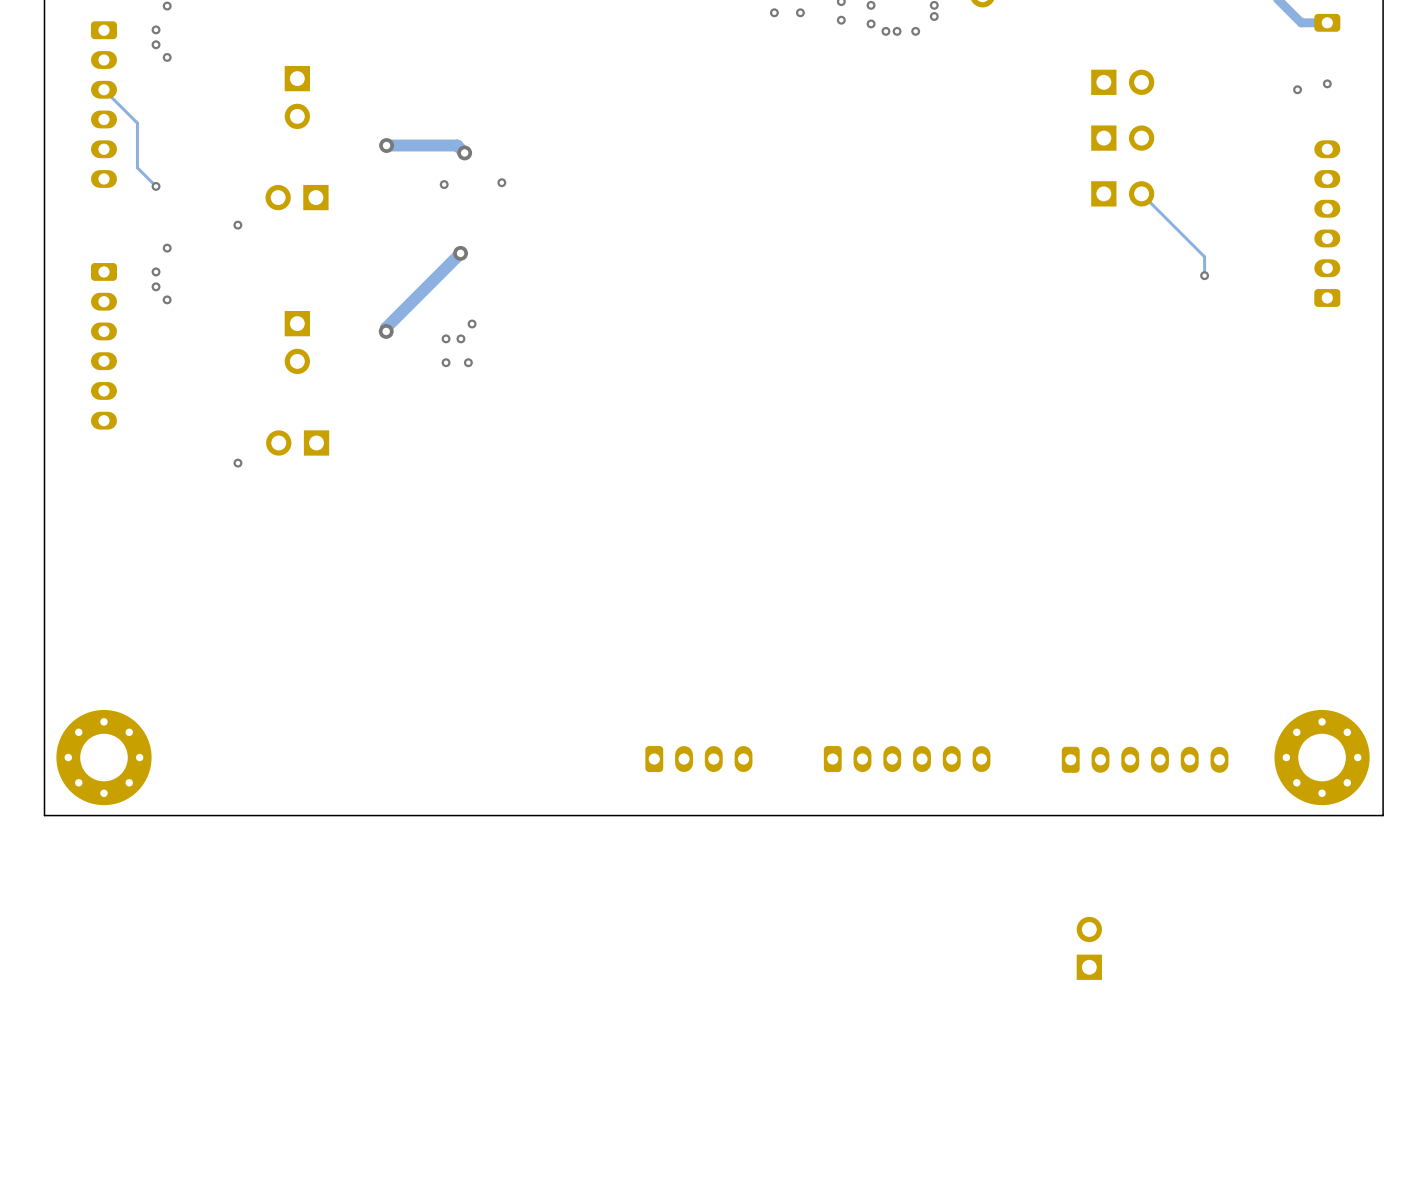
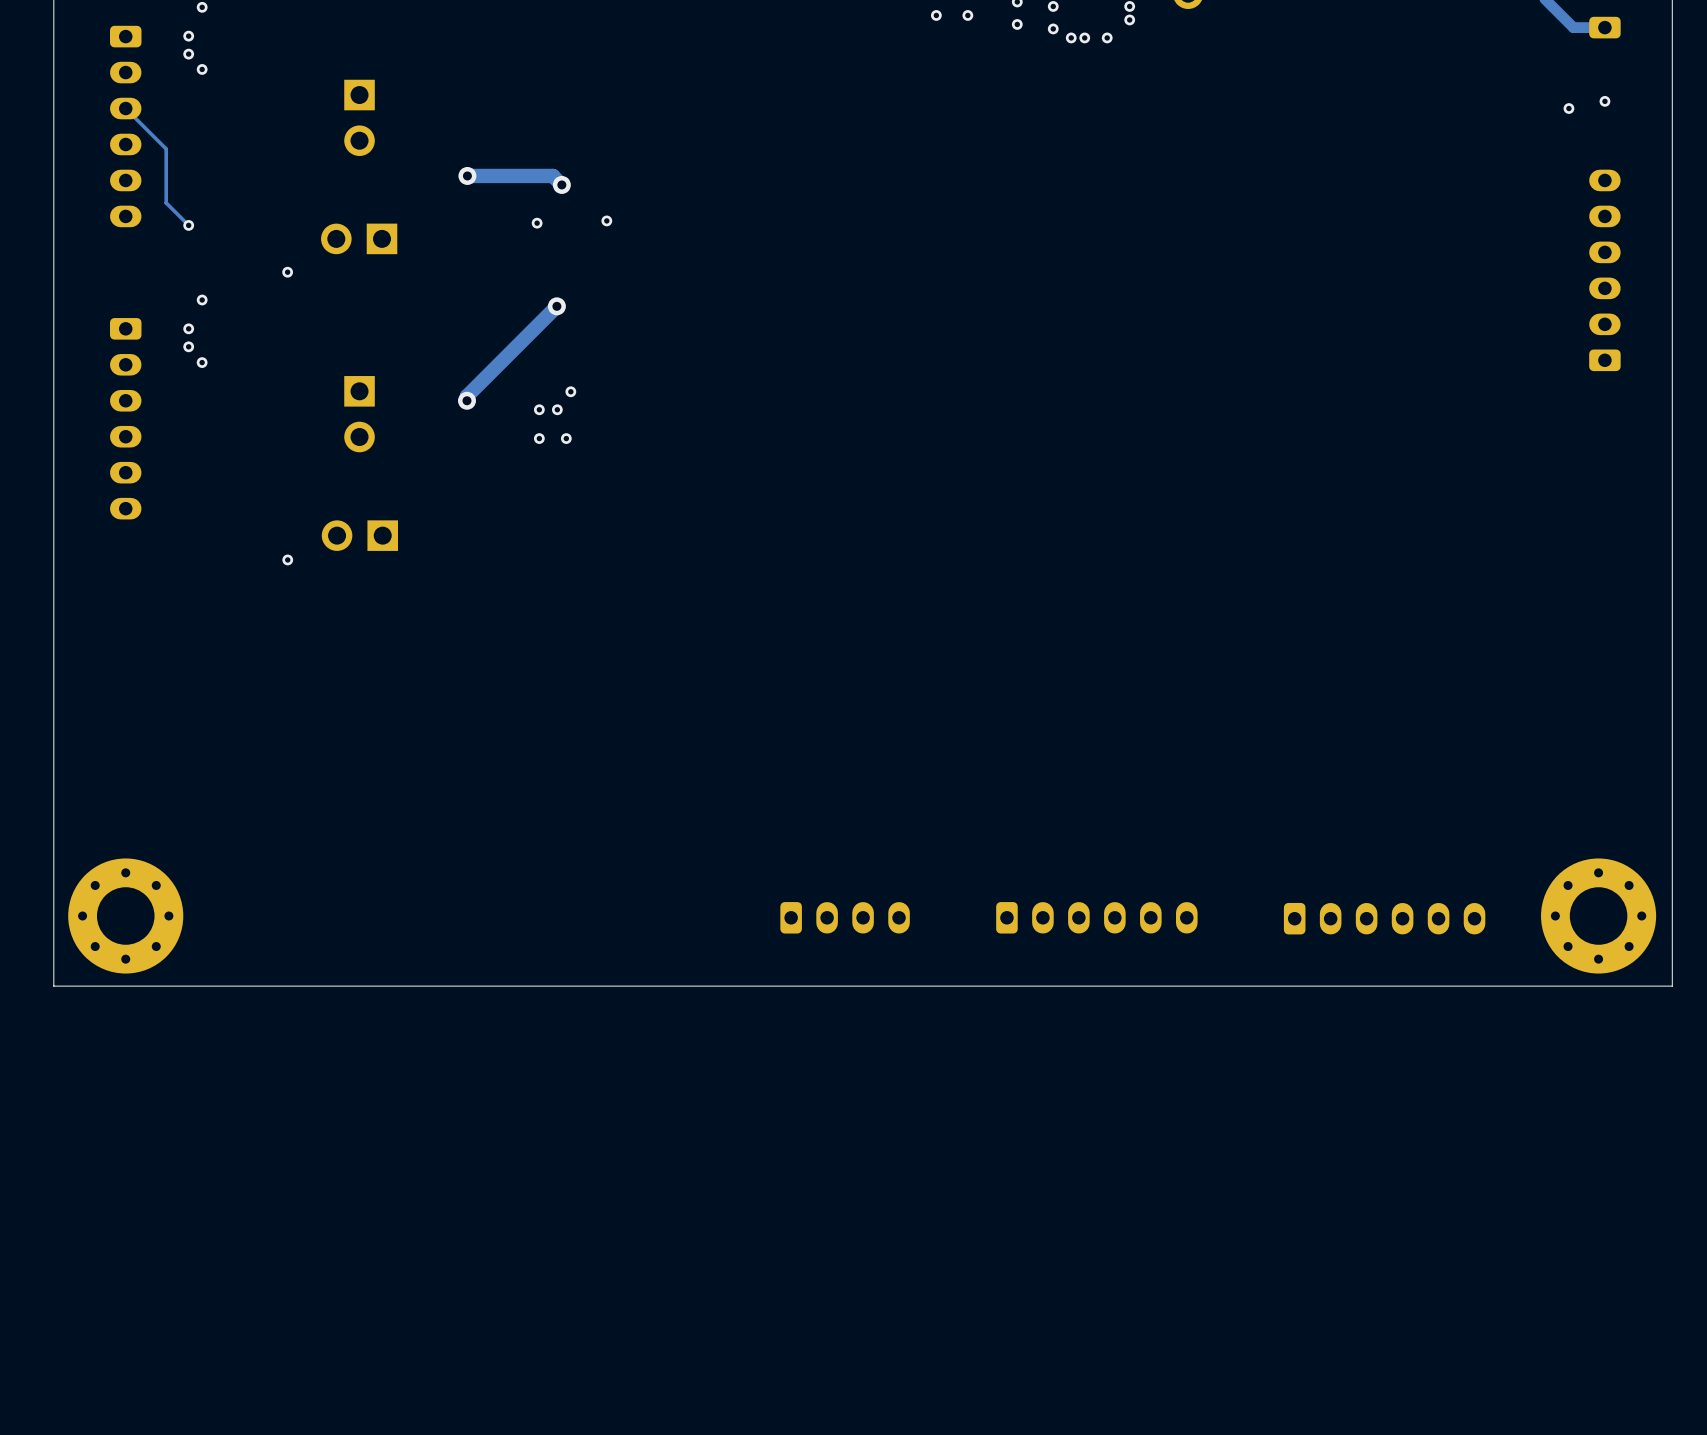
part: (1122, 82) -> none
part: (1122, 138) -> none
part: (1122, 193) -> none
track: (1141, 193) (1204, 256) (1204, 275) -> none
via: (1204, 275) -> none
part: (1089, 948) -> none

